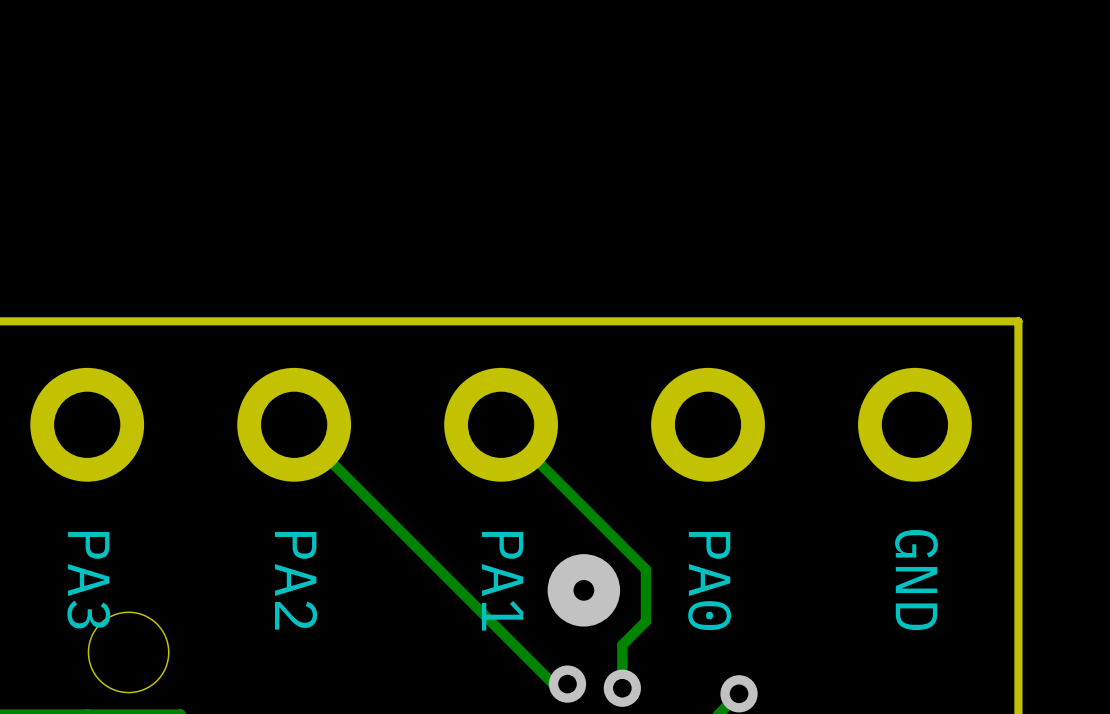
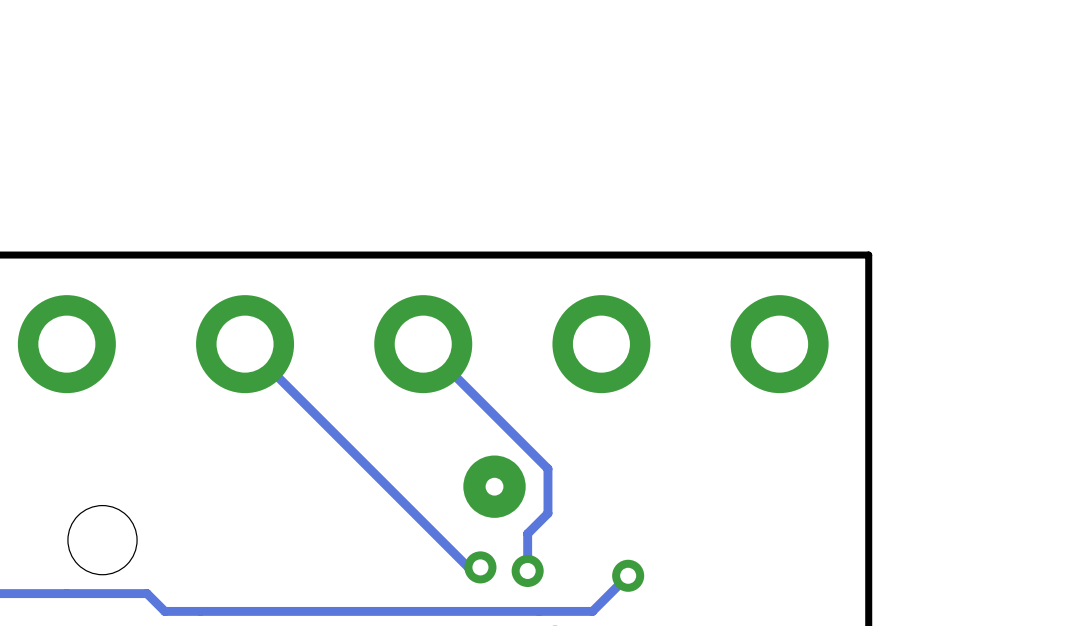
text: PA3 (88, 580) -> none
text: PA2 (296, 580) -> none
text: GND (916, 580) -> none
text: PA1 (502, 581) -> none
text: PA0 (709, 581) -> none

